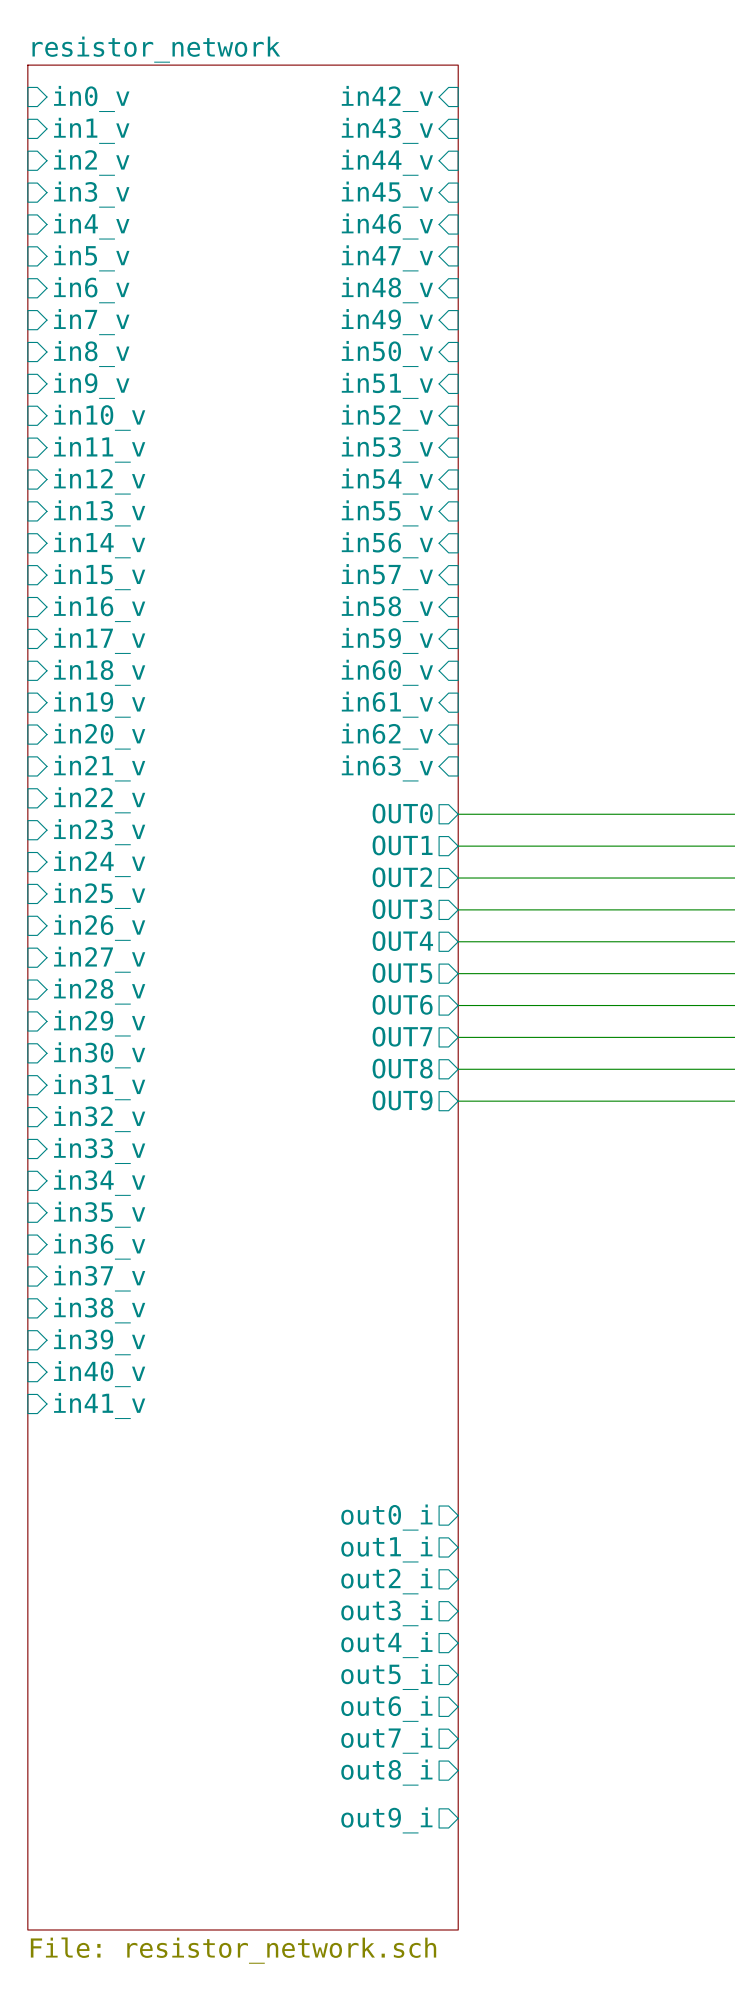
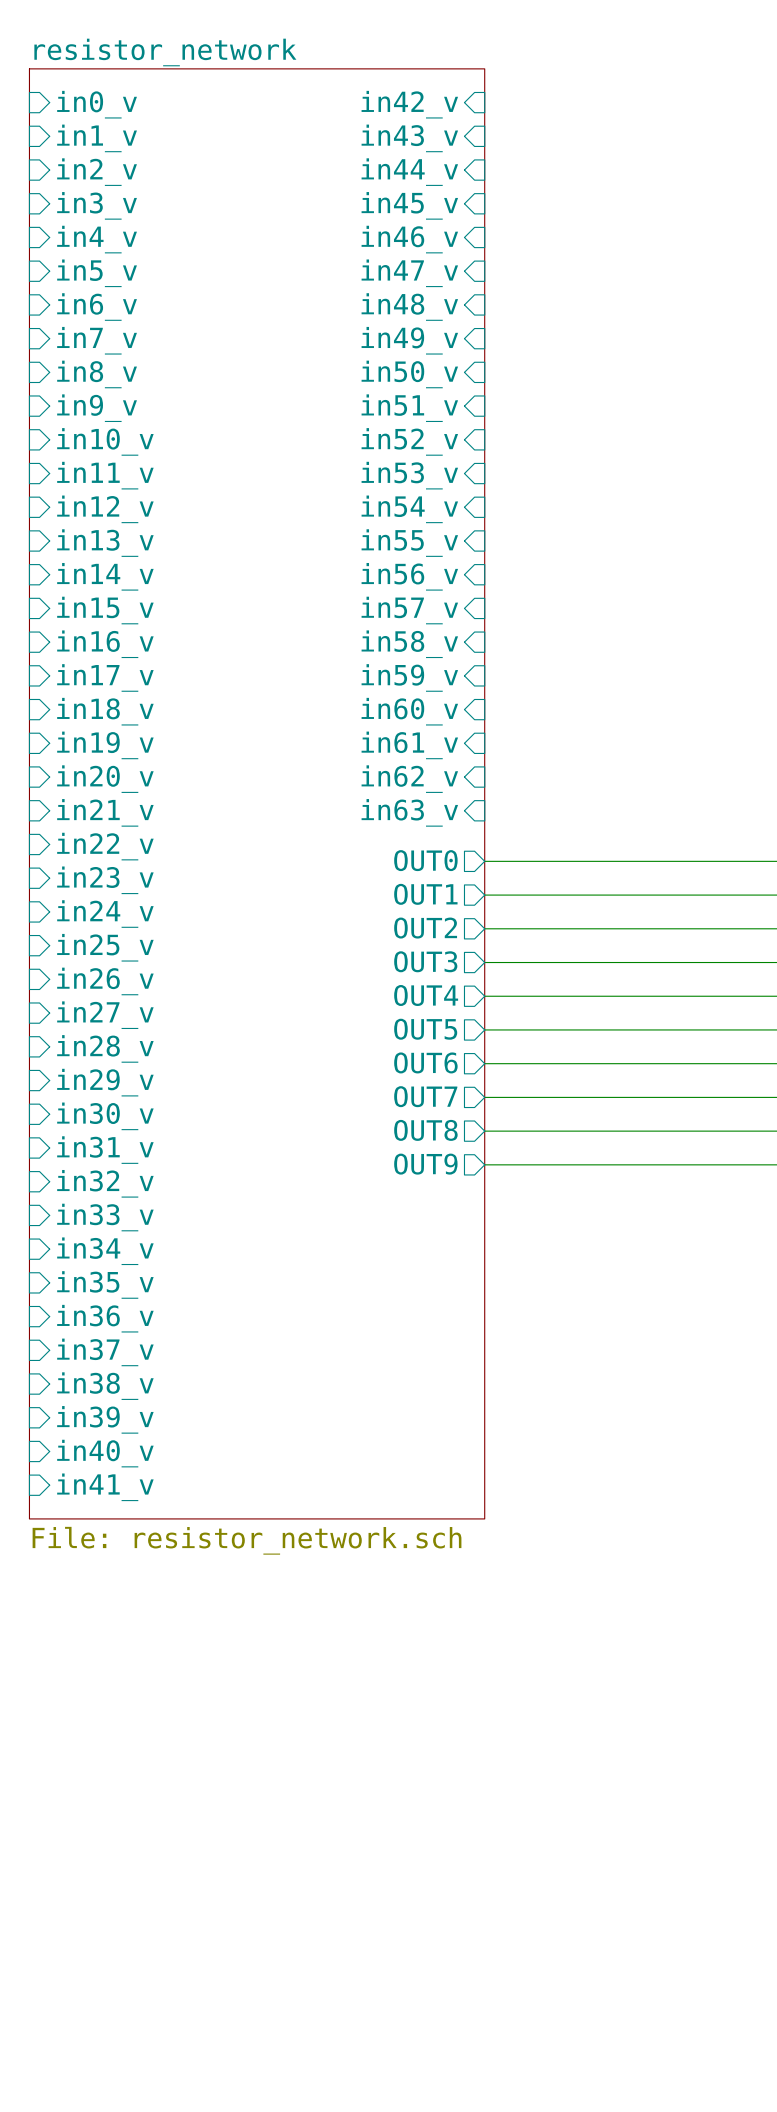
sheet resistor_network: none -> File: resistor_network.sch (257, 793)
sheet resistor_network: File: resistor_network.sch (243, 997) -> none
sheet pin: out0_i (386, 1517) -> none
sheet pin: out1_i (386, 1549) -> none
sheet pin: out2_i (386, 1581) -> none
sheet pin: out3_i (386, 1613) -> none
sheet pin: out4_i (386, 1645) -> none
sheet pin: out5_i (386, 1676) -> none
sheet pin: out6_i (386, 1708) -> none
sheet pin: out7_i (386, 1740) -> none
sheet pin: out8_i (386, 1772) -> none
sheet pin: out9_i (386, 1820) -> none

